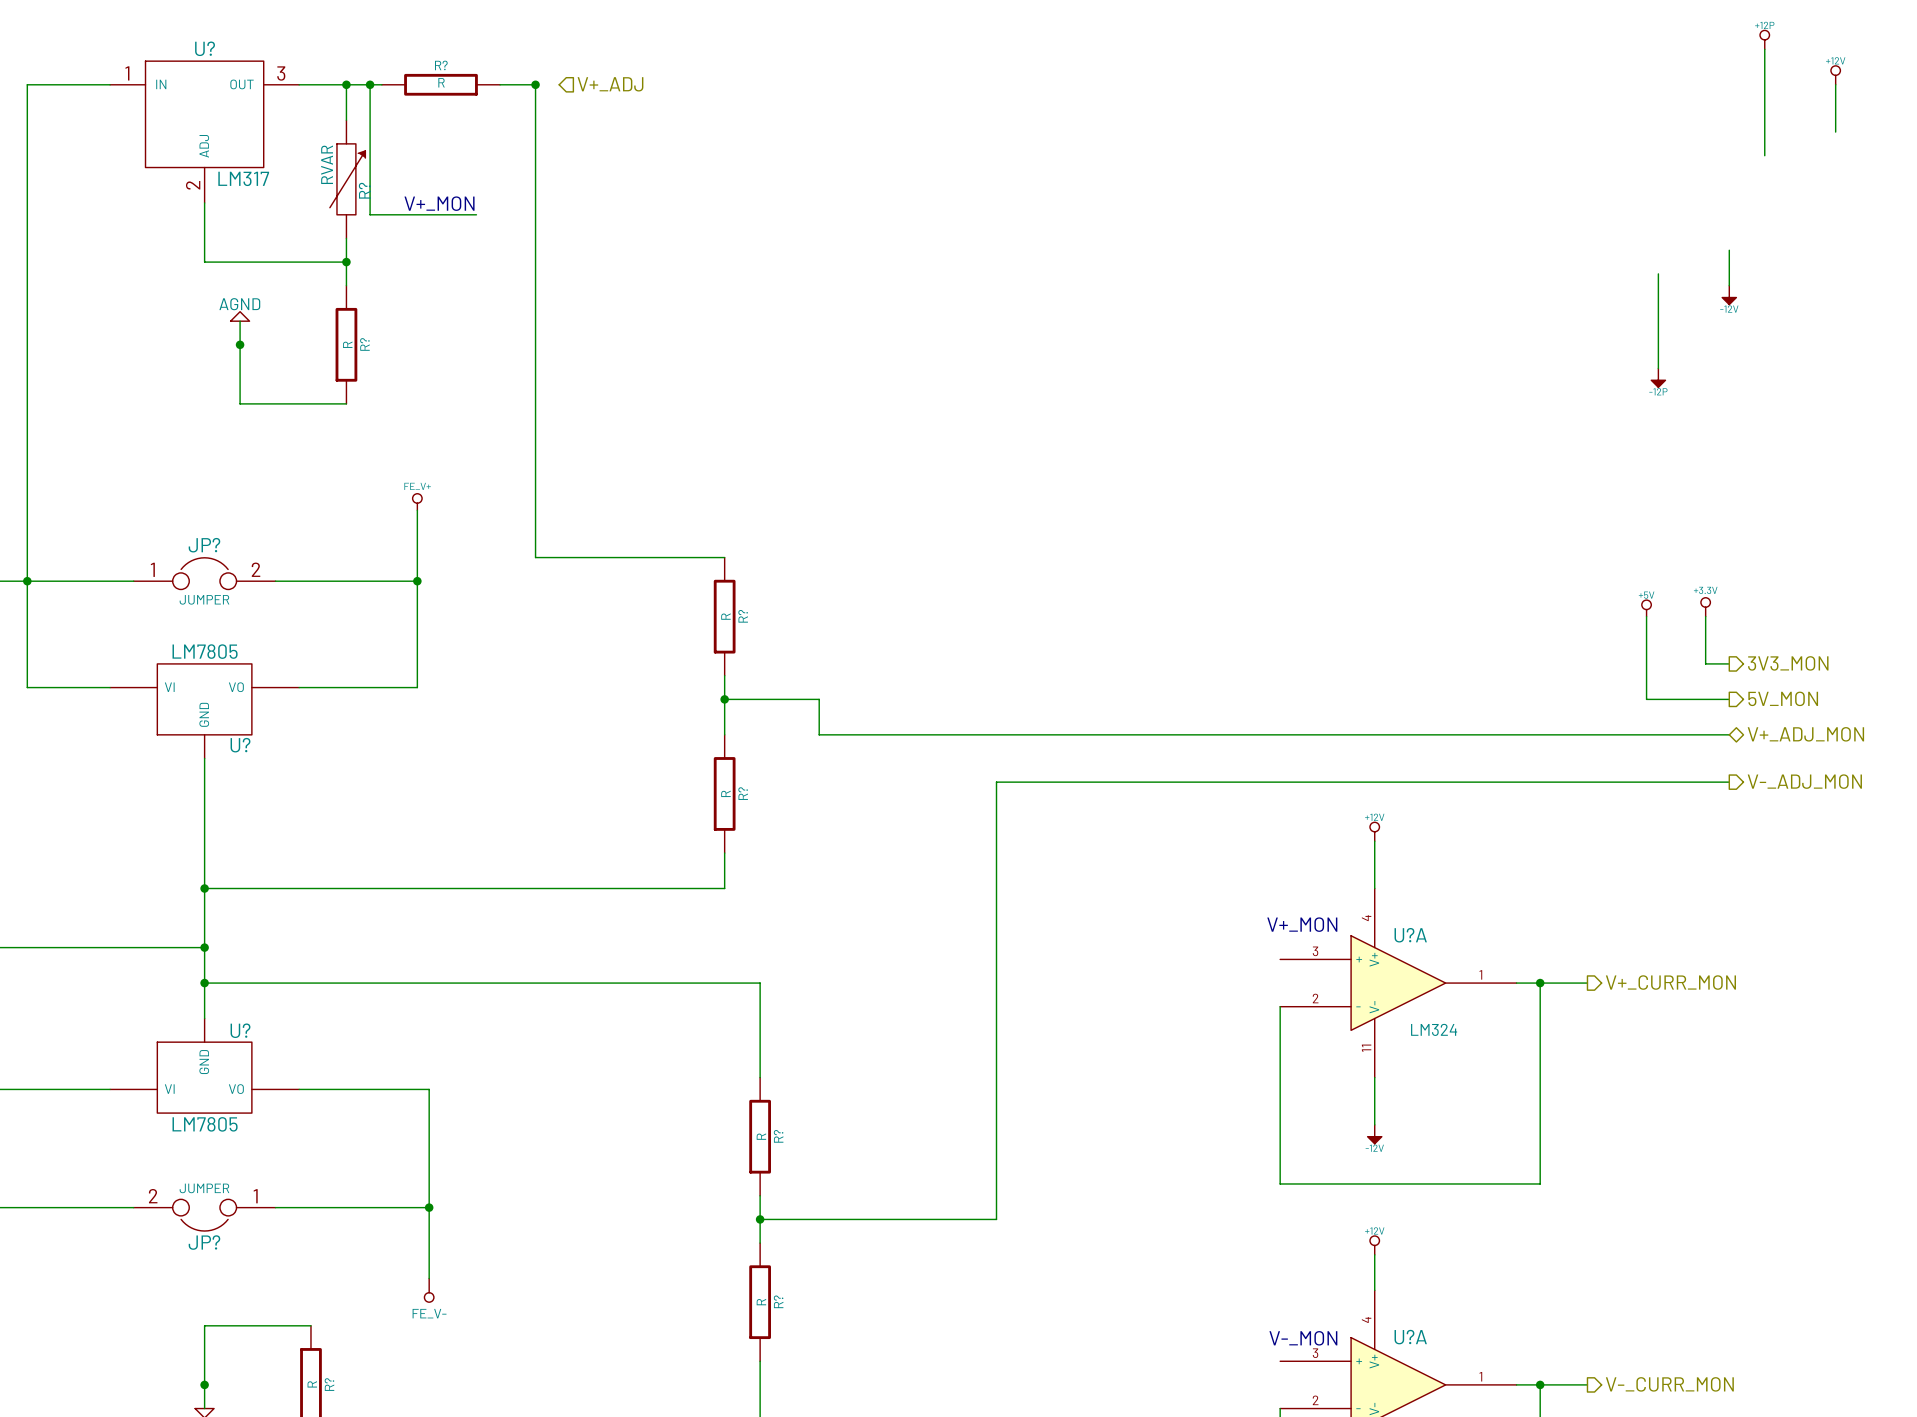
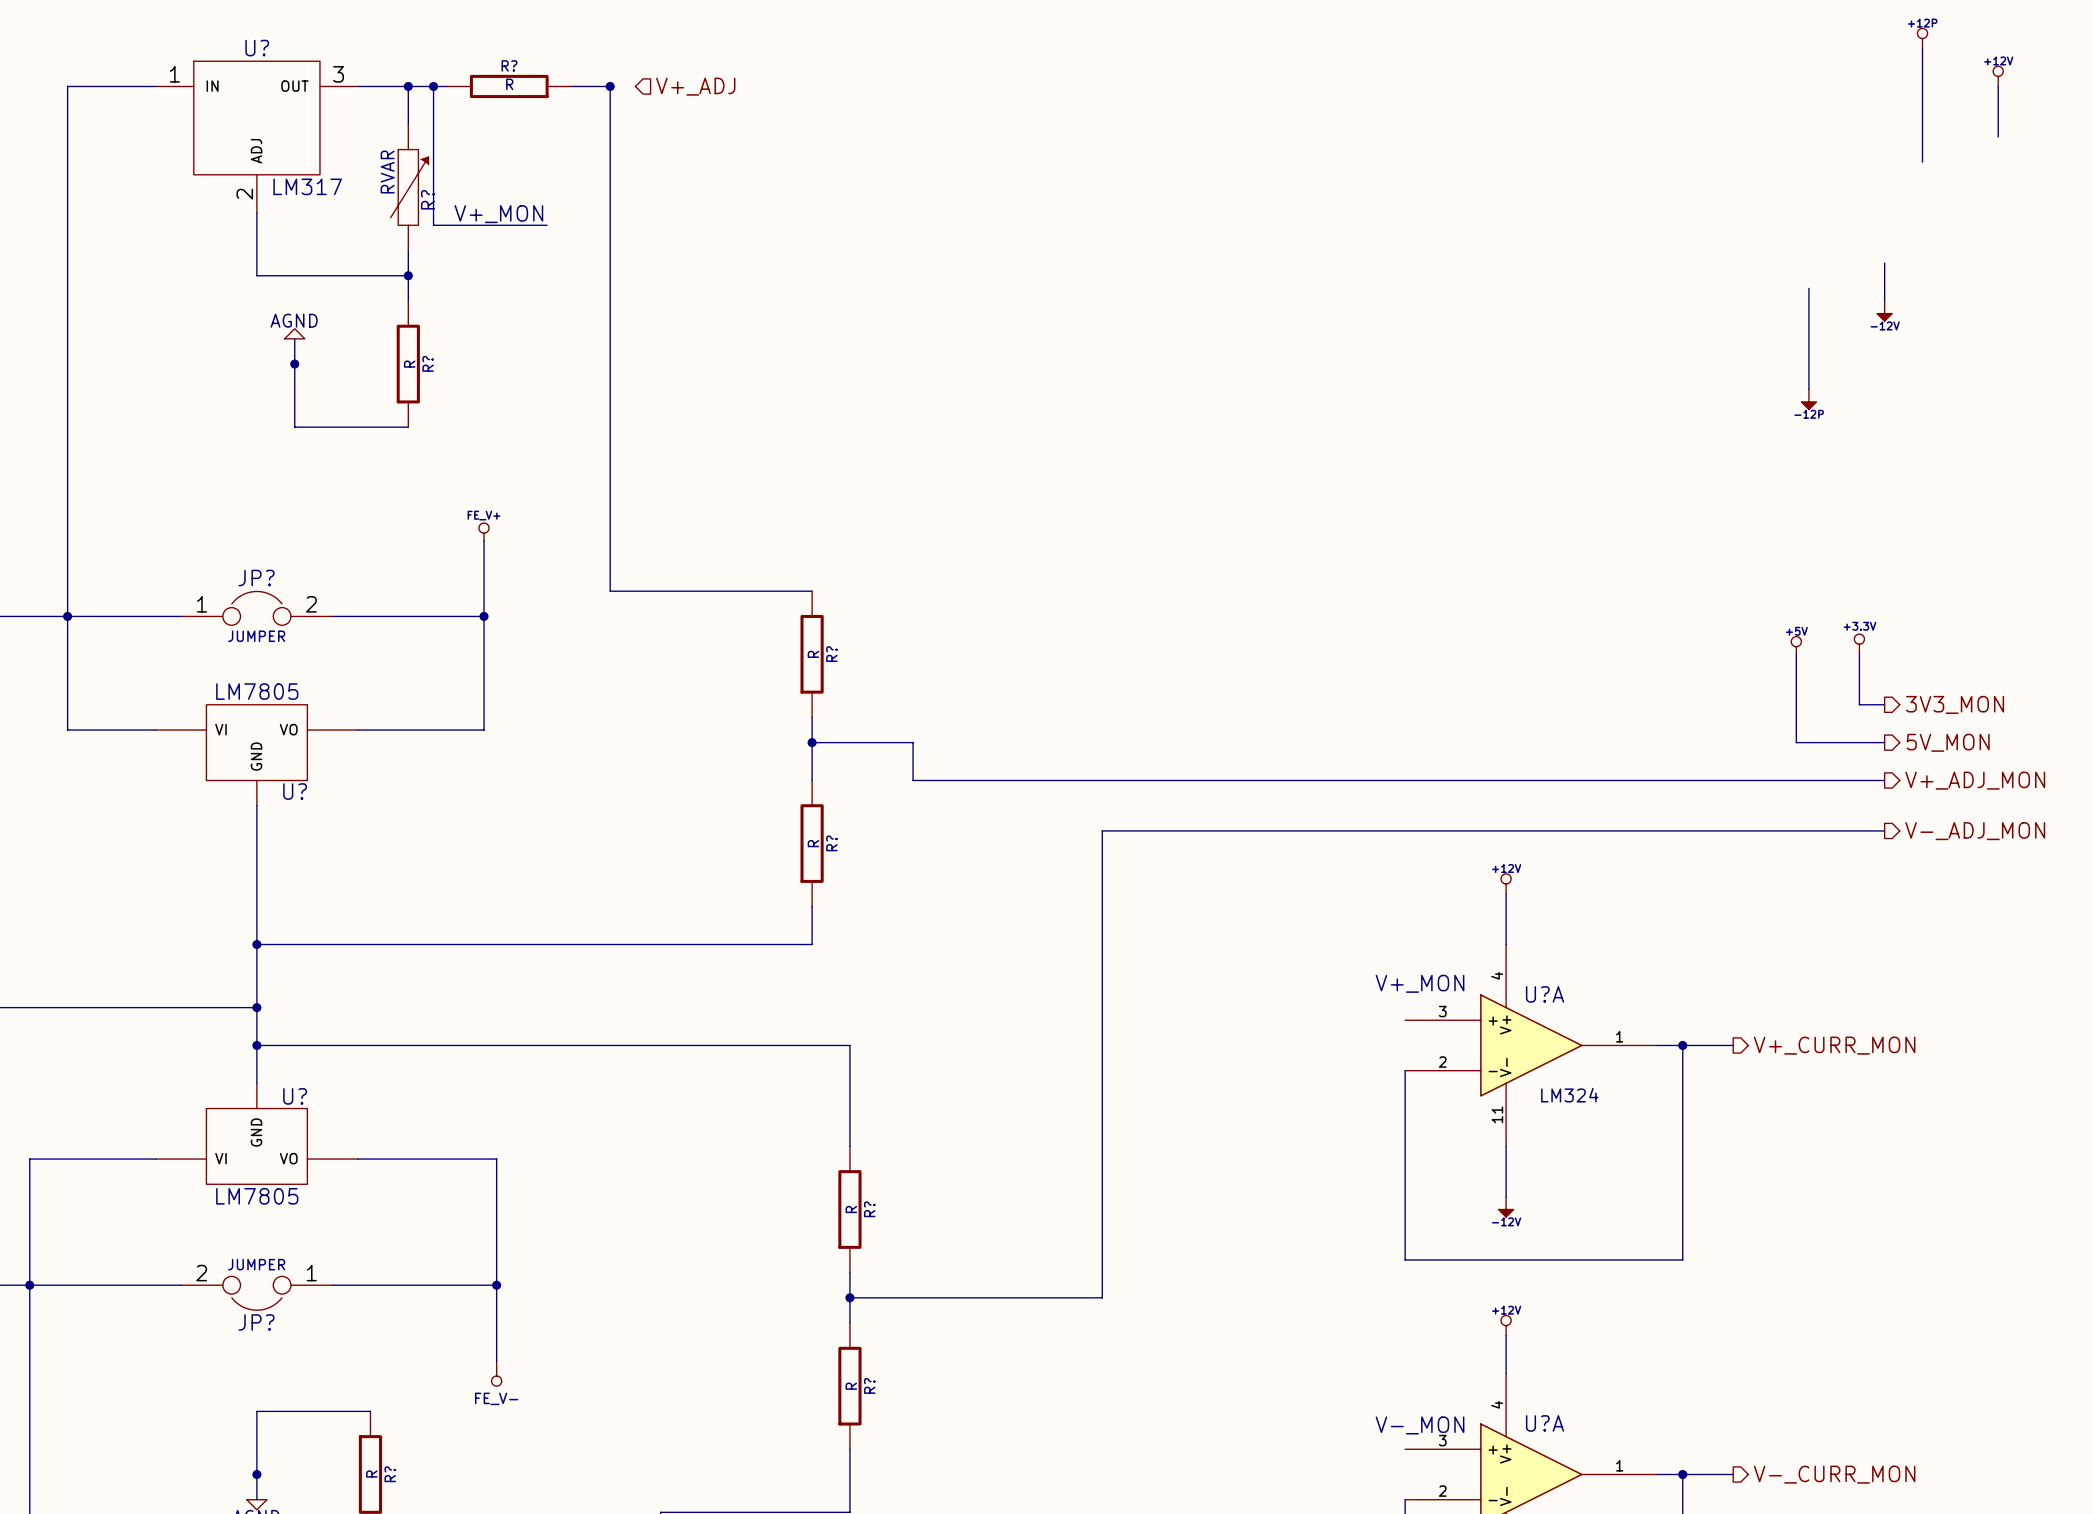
hierarchical label shape: bidirectional (1805, 734) -> output (1975, 780)

